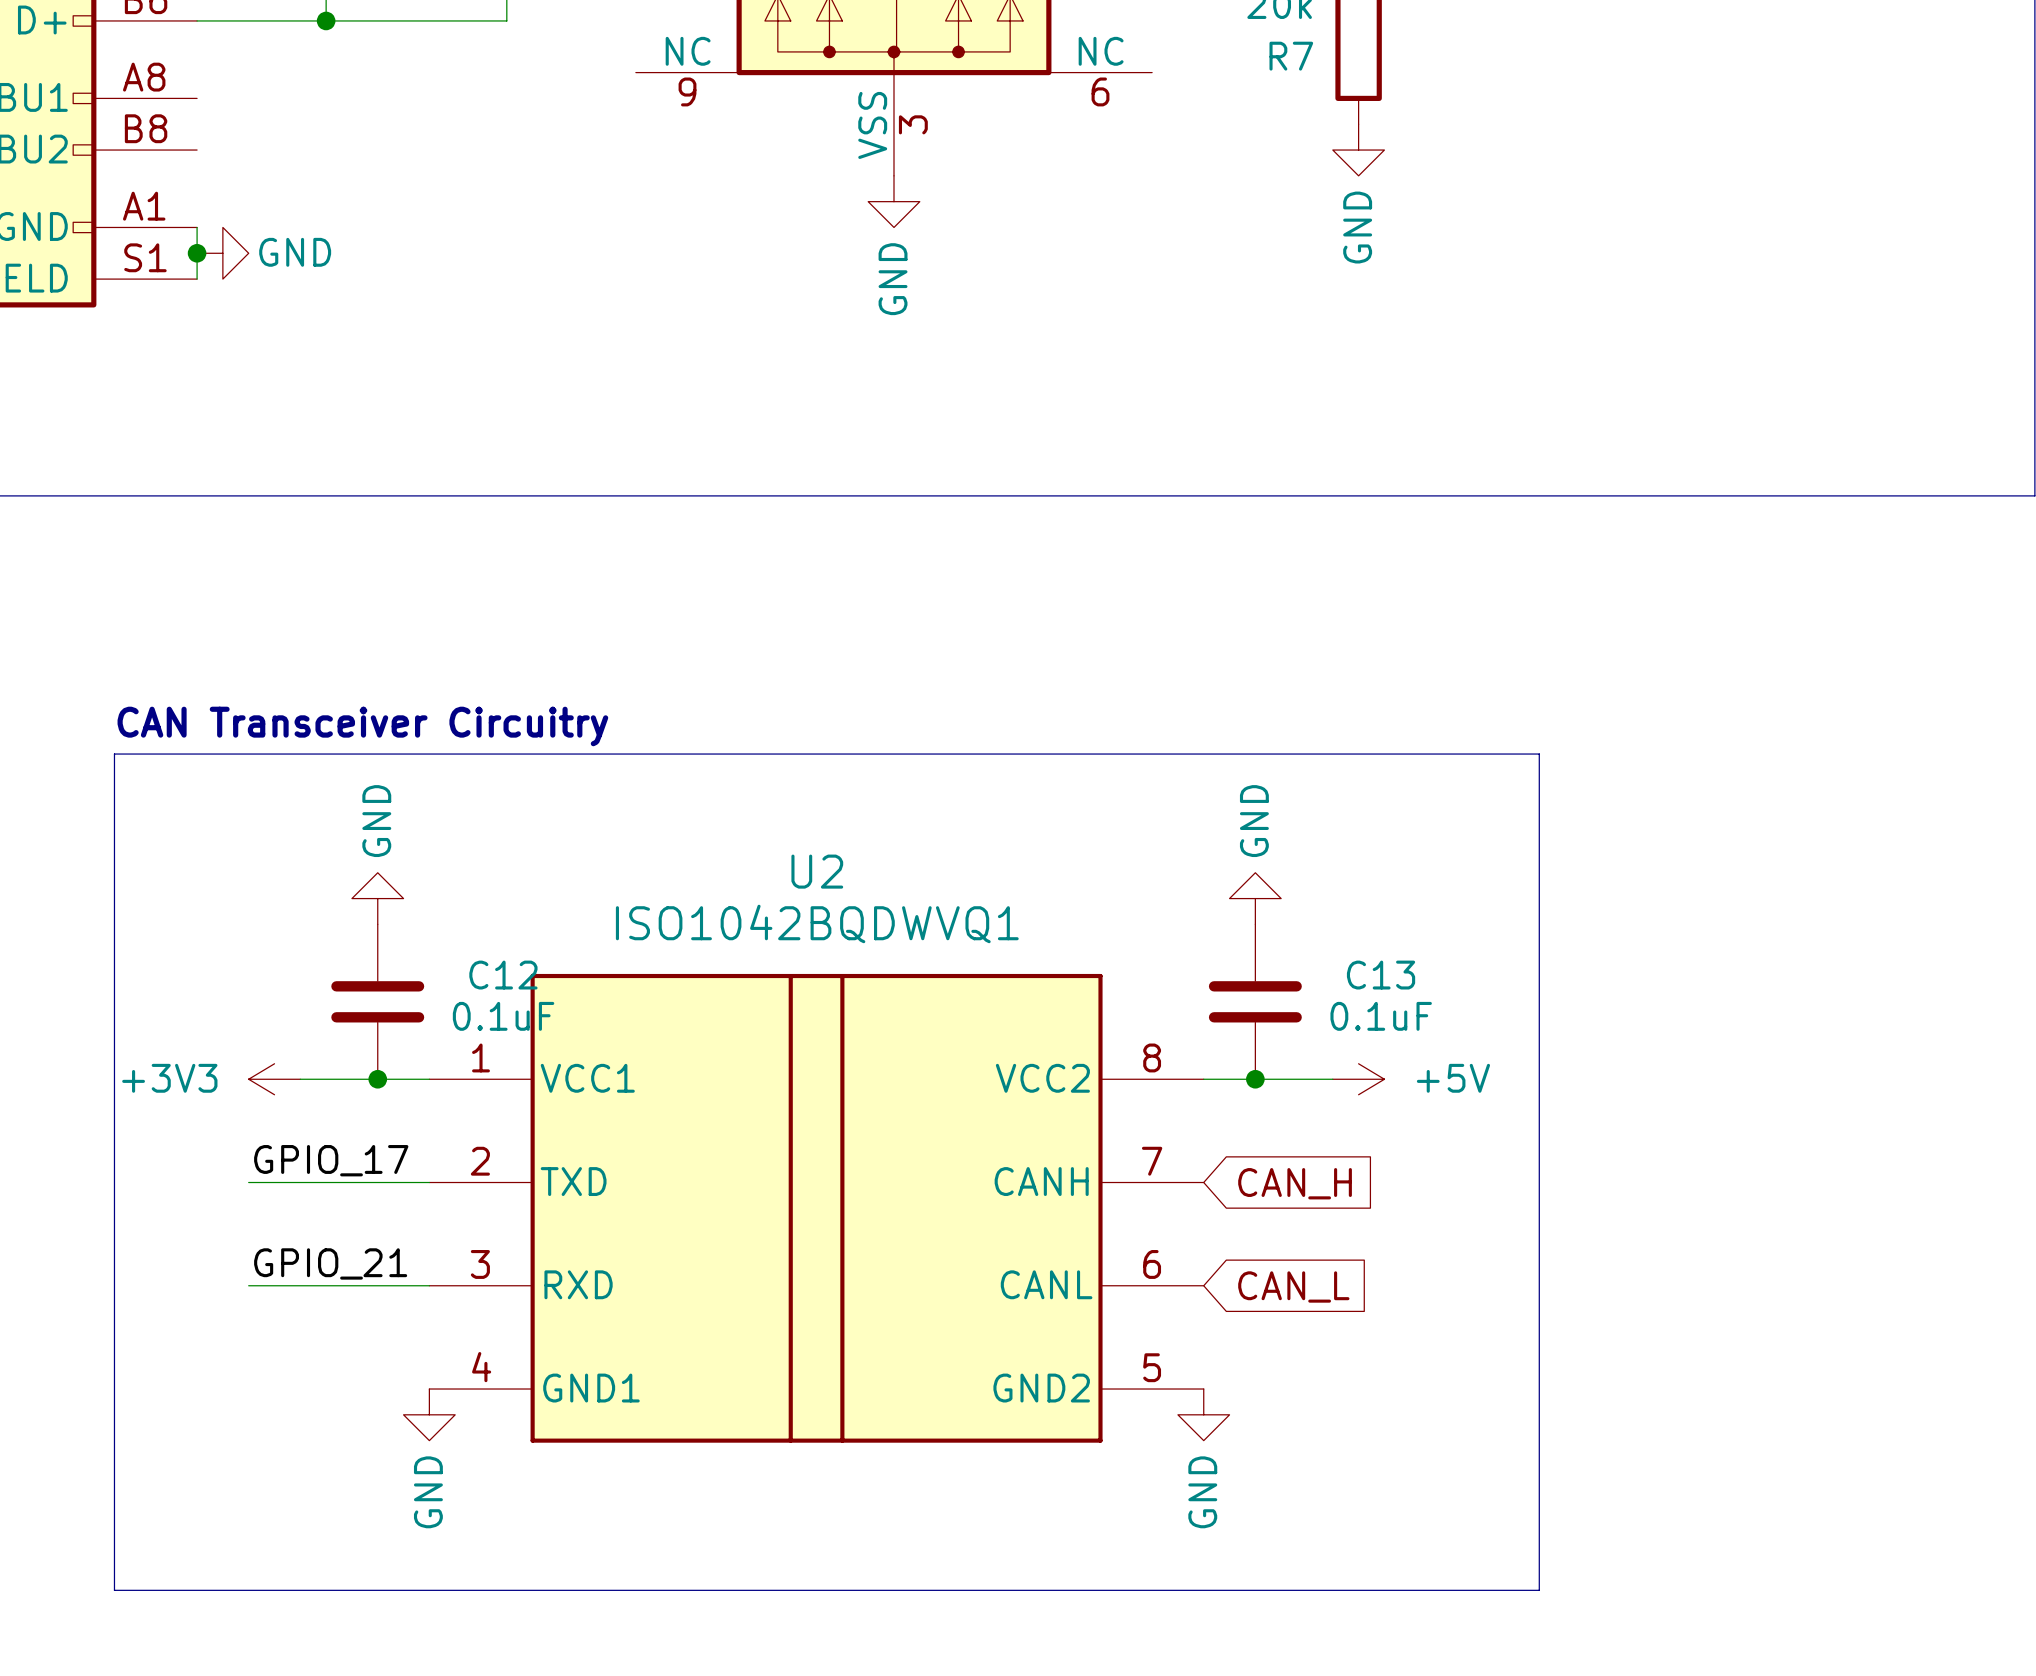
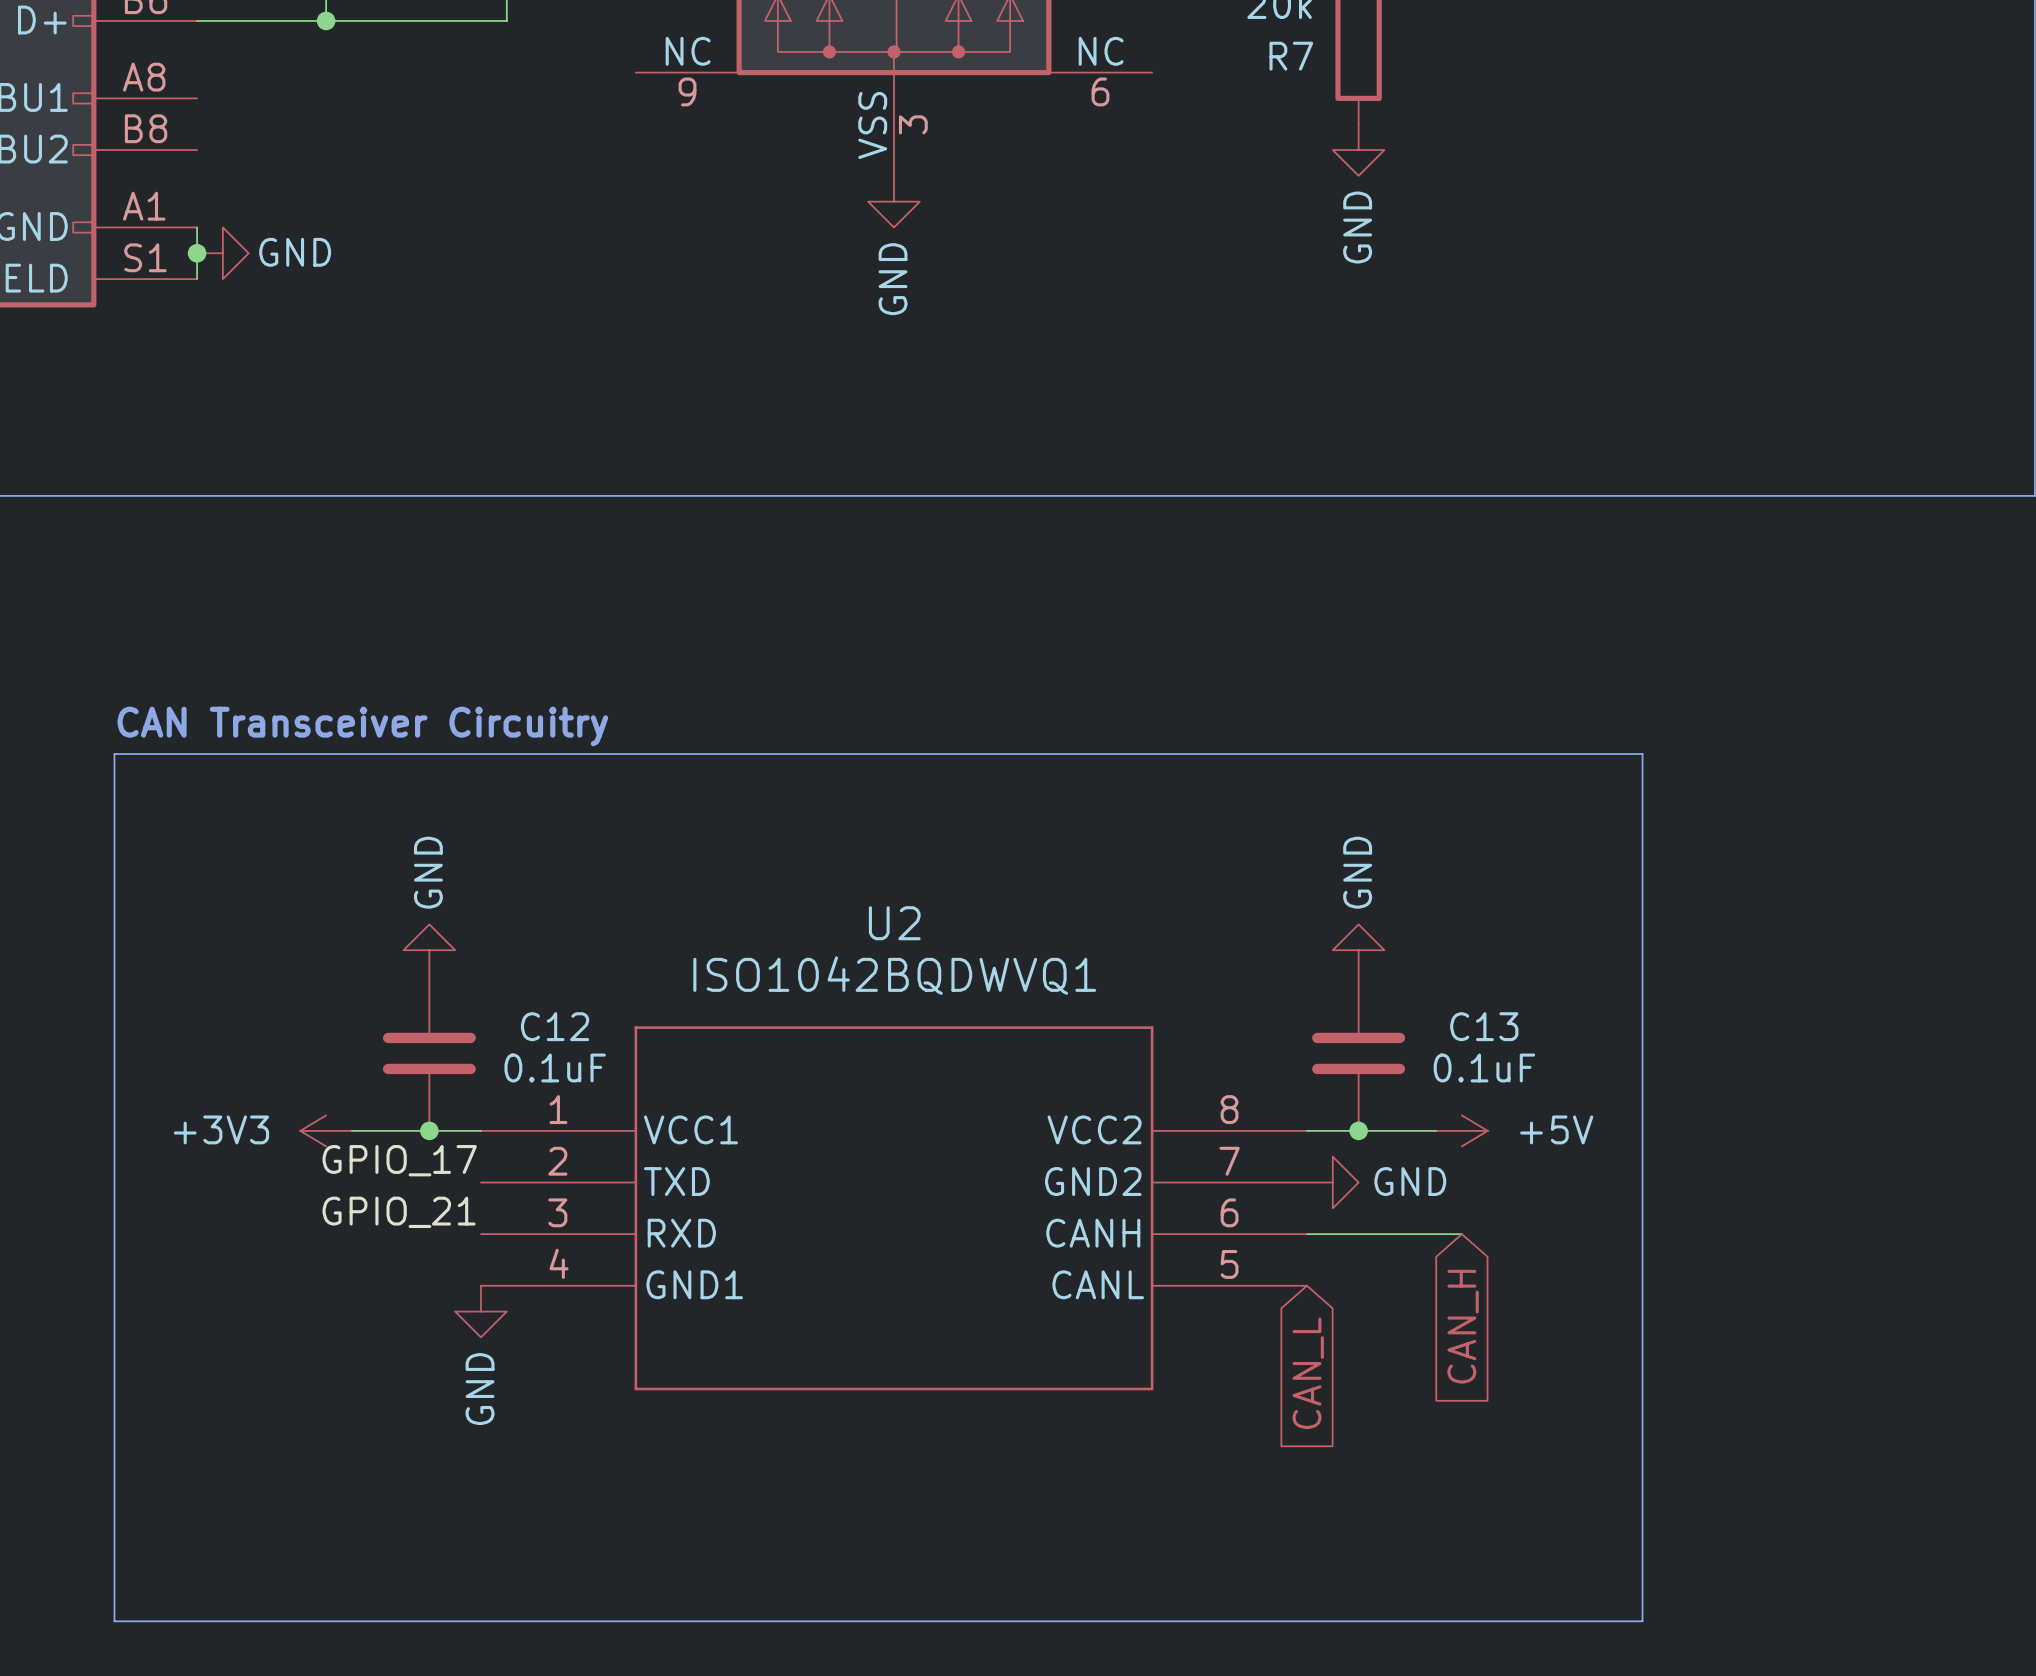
line: (1539, 754) (1539, 1590) (114, 1590) -> (1539, 754) (1642, 754) (1642, 1621) (114, 1621) (114, 1590)
U2 name position: U2 (817, 871) -> U2 (894, 923)
power symbol position: GND (377, 898) -> GND (429, 950)
power symbol position: GND (1255, 898) -> GND (1358, 950)
U2 value position: ISO1042BQDWVQ1 (817, 923) -> ISO1042BQDWVQ1 (894, 975)
U2 symbol: [429, 973, 1204, 1443] -> [481, 1026, 1307, 1391]
C12 position: (377, 1001) -> (429, 1053)
C13 position: (1255, 1001) -> (1358, 1053)
power symbol position: +3V3 (274, 1079) -> +3V3 (326, 1130)
wire: (300, 1079) (429, 1079) -> (351, 1130) (481, 1130)
junction position: (377, 1079) -> (429, 1130)
wire: (1203, 1079) (1332, 1079) -> (1306, 1130) (1436, 1130)
junction position: (1255, 1079) -> (1358, 1130)
power symbol position: +5V (1358, 1079) -> +5V (1461, 1130)
label position: GPIO_17 (331, 1160) -> GPIO_17 (399, 1160)
wire: (248, 1182) (429, 1182) -> none
power symbol: none -> GND (1332, 1182)
global label rotation: 0° (1295, 1183) -> 90° clockwise (1463, 1326)
global label position: CAN_H (1295, 1183) -> CAN_H (1463, 1326)
wire: none -> (1306, 1234) (1461, 1234)
label position: GPIO_21 (330, 1263) -> GPIO_21 (399, 1212)
wire: (248, 1285) (429, 1285) -> none
global label rotation: 0° (1293, 1286) -> 90° clockwise (1308, 1373)
power symbol position: GND (429, 1414) -> GND (481, 1311)
power symbol: GND (1203, 1414) -> none

